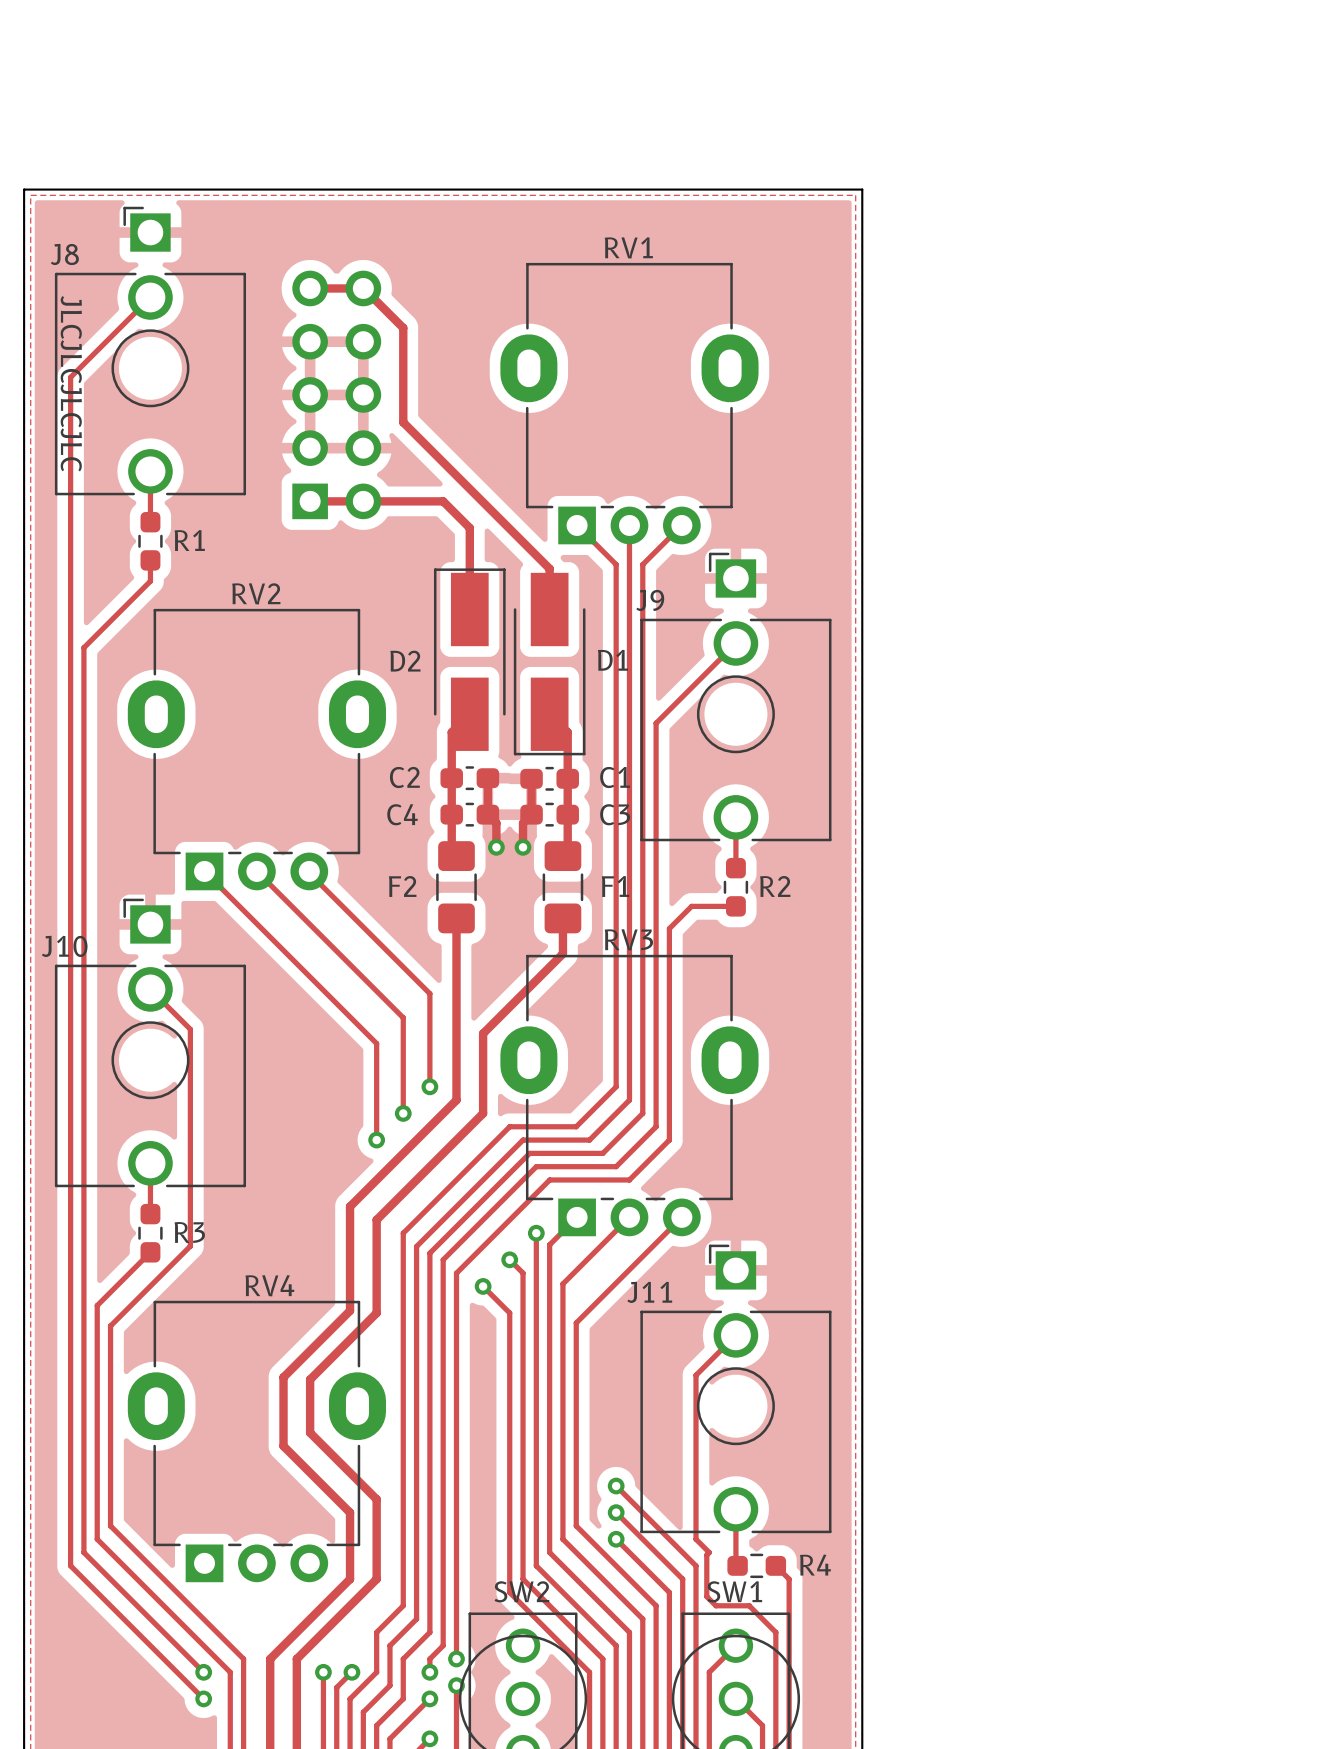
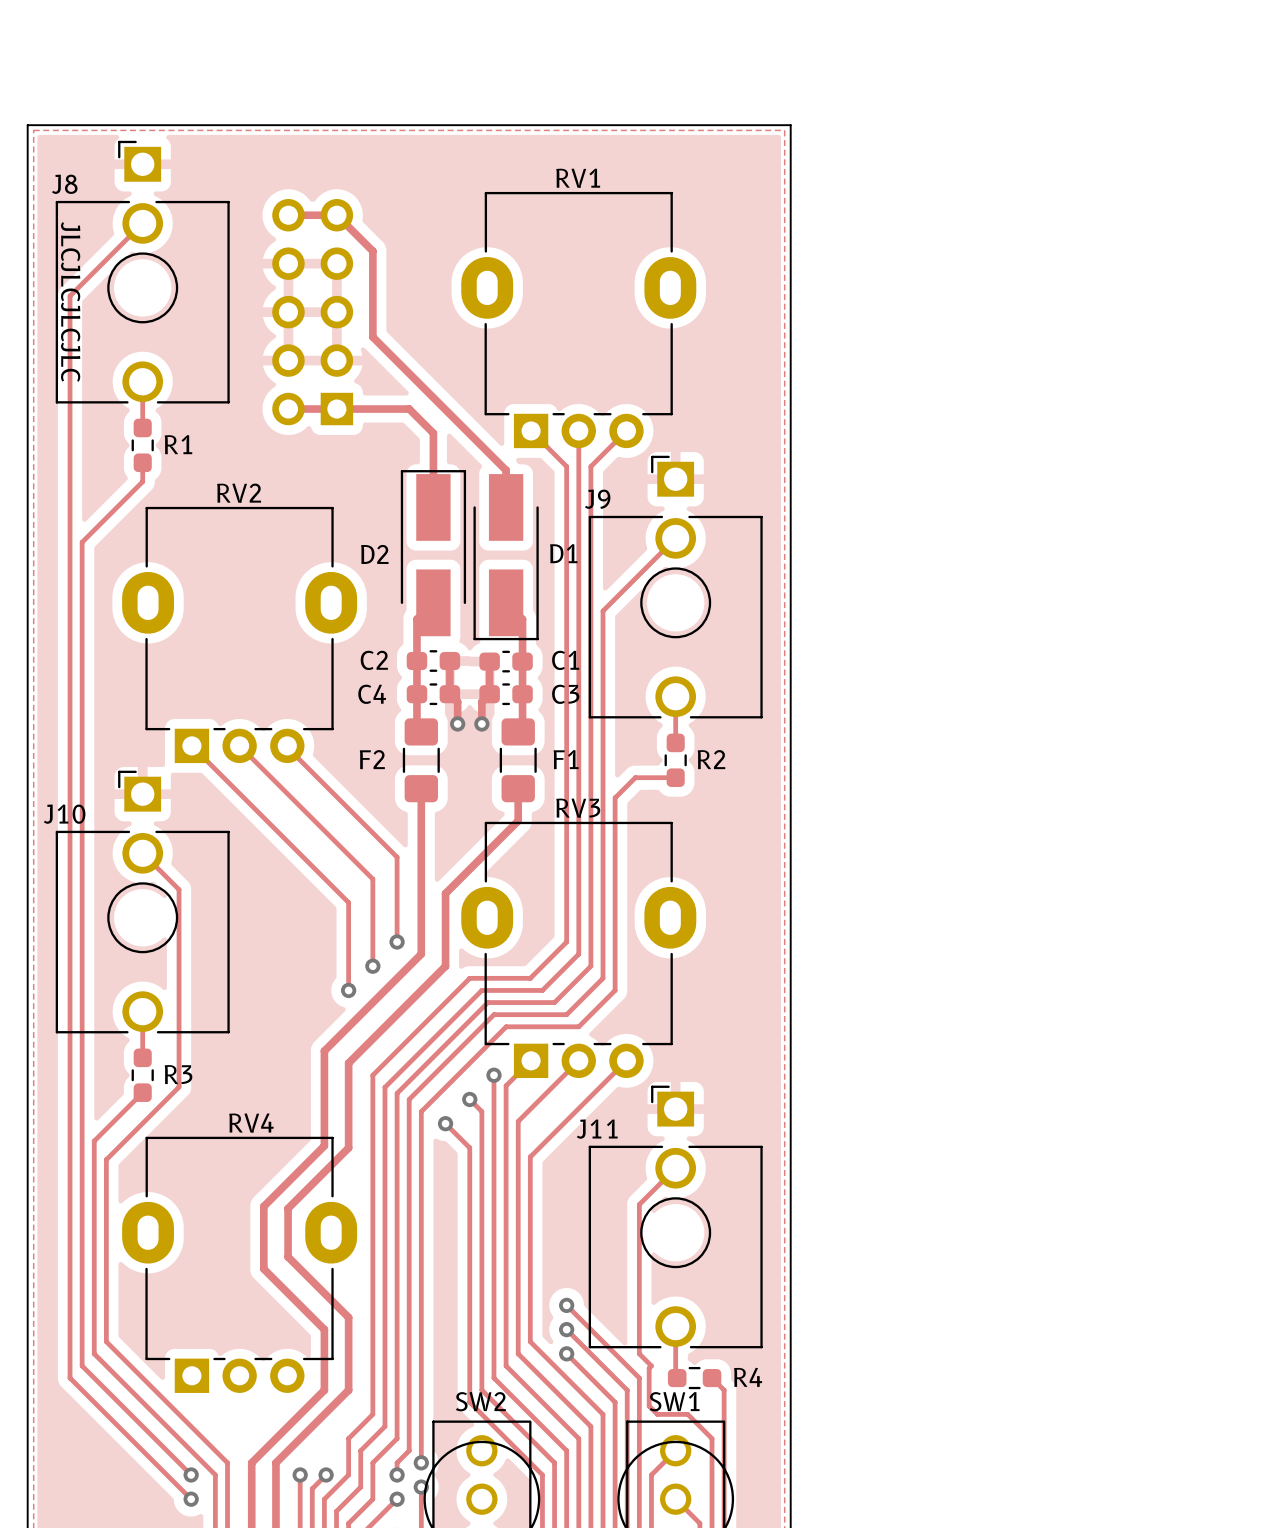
part footprint: [292, 270, 382, 520] -> [272, 199, 354, 426]

